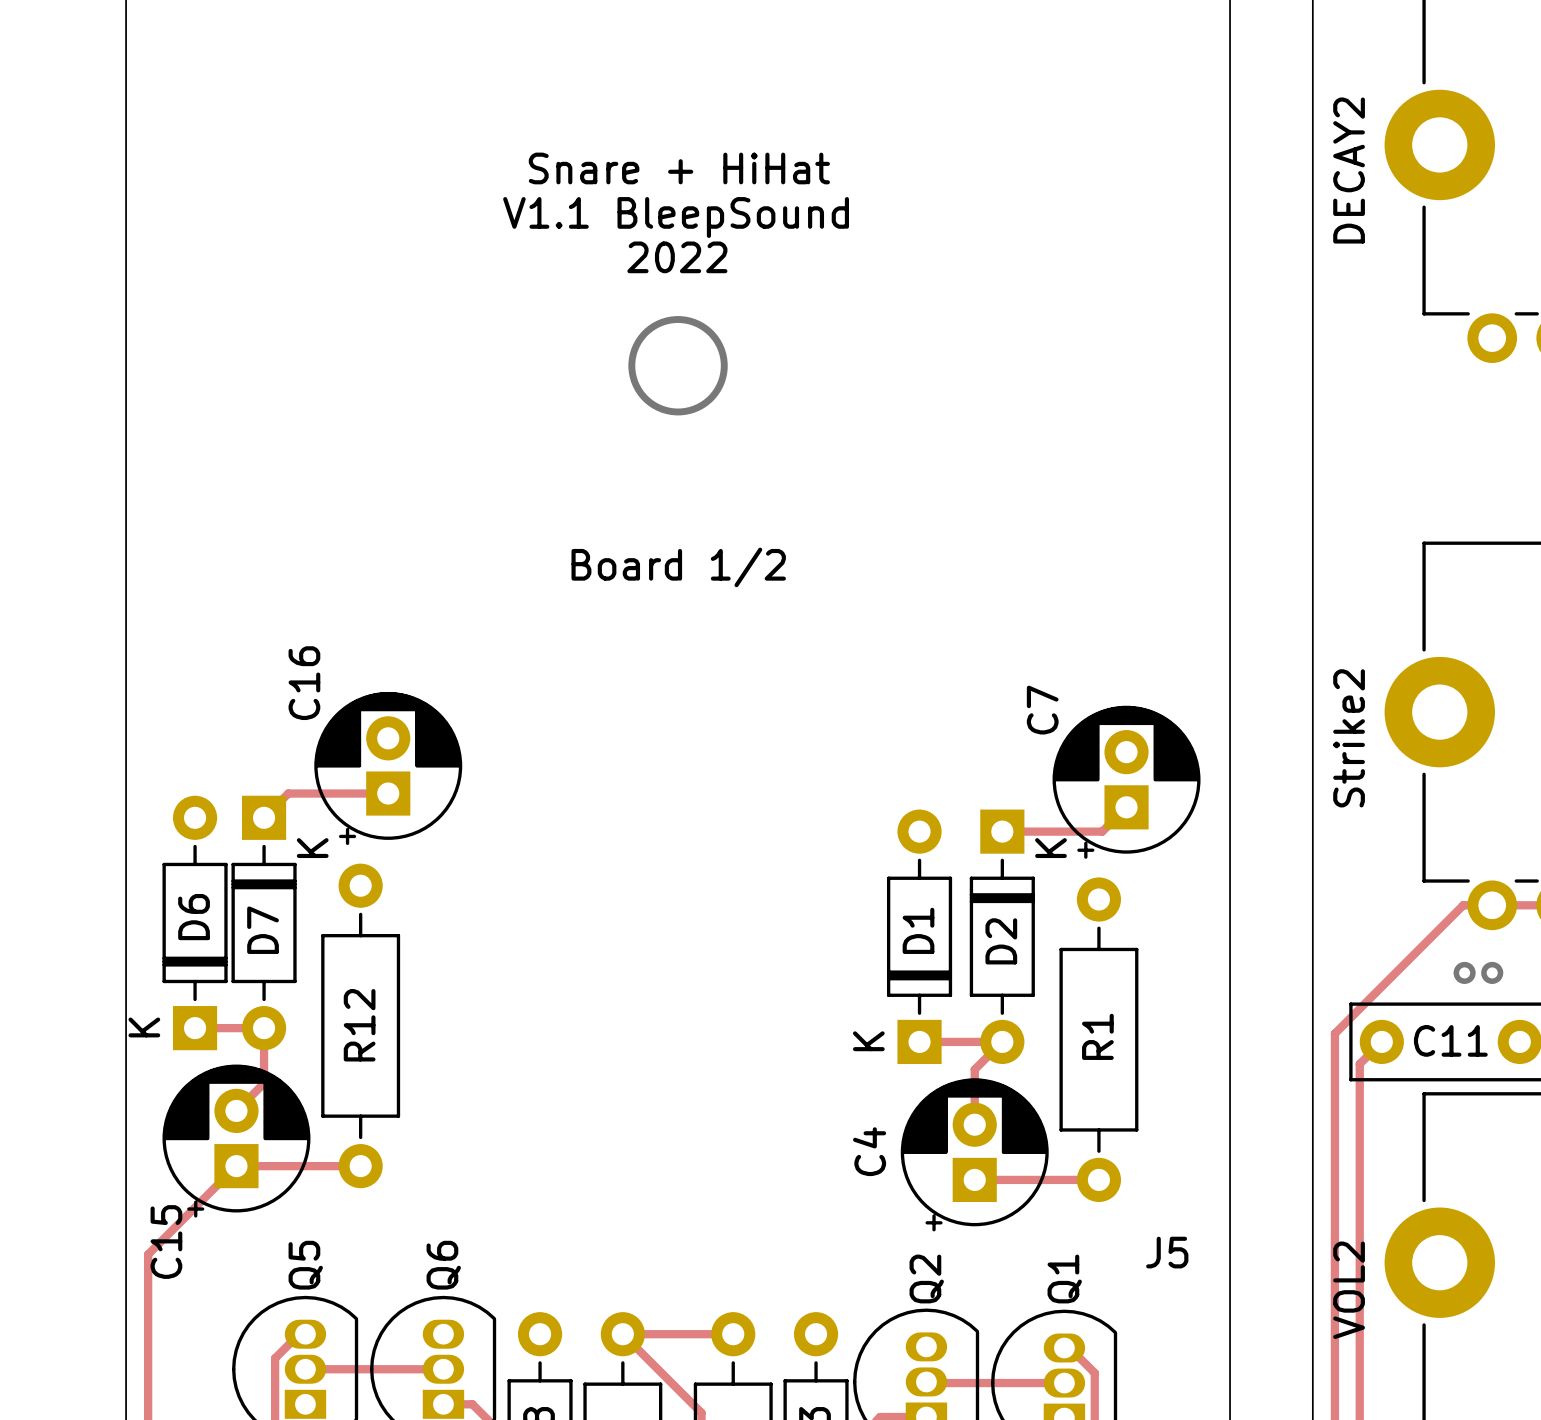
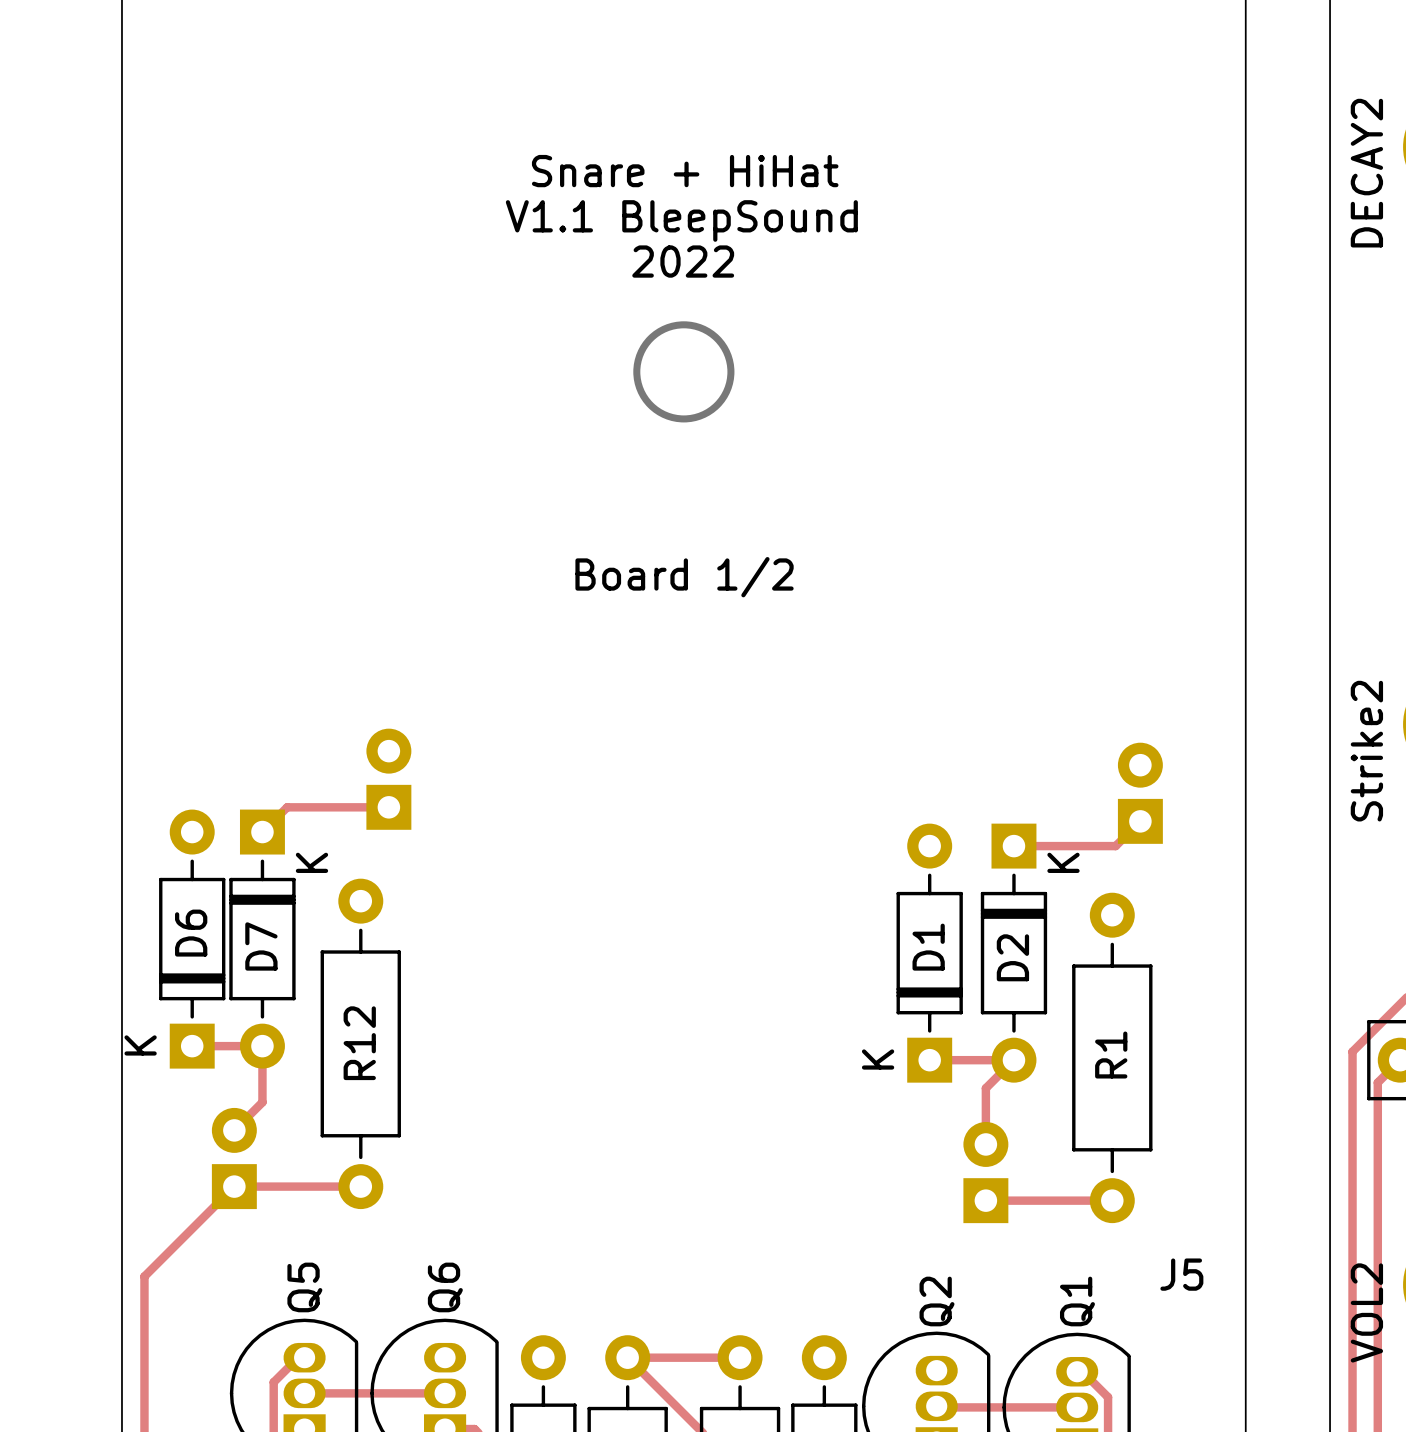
C16 side: top (388, 768) -> bottom (388, 779)
C7 side: top (1126, 782) -> bottom (1140, 793)
C15 side: top (236, 1141) -> bottom (234, 1158)
C4 side: top (974, 1154) -> bottom (985, 1172)

